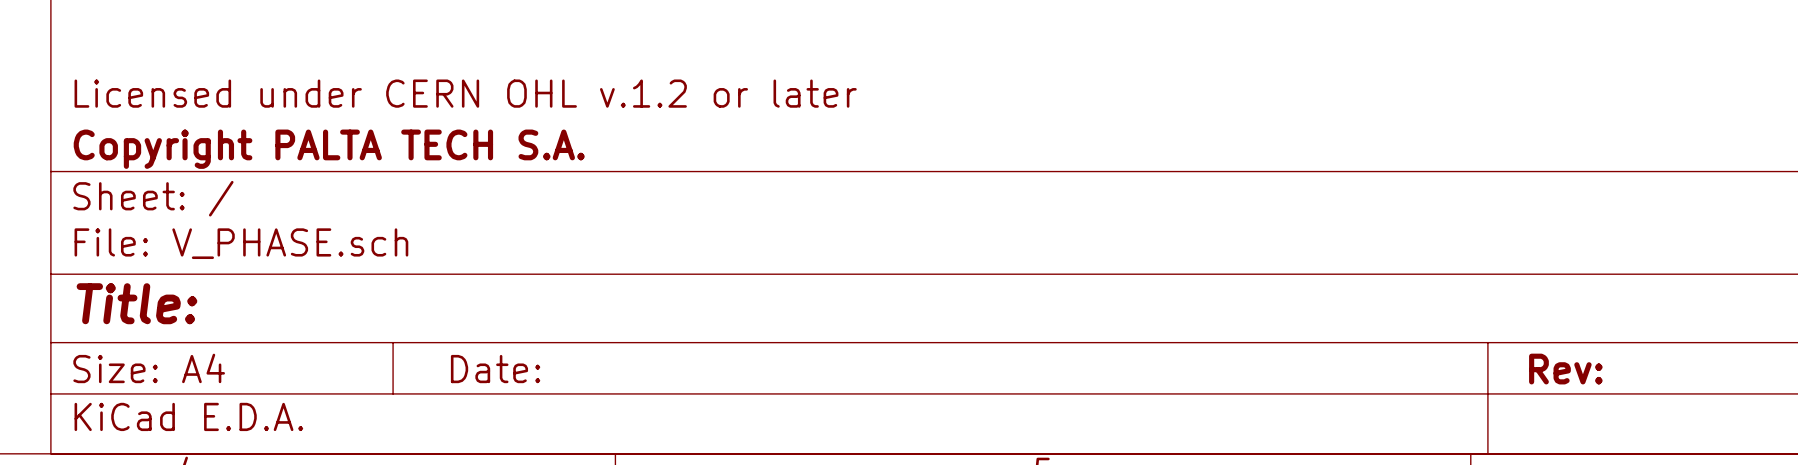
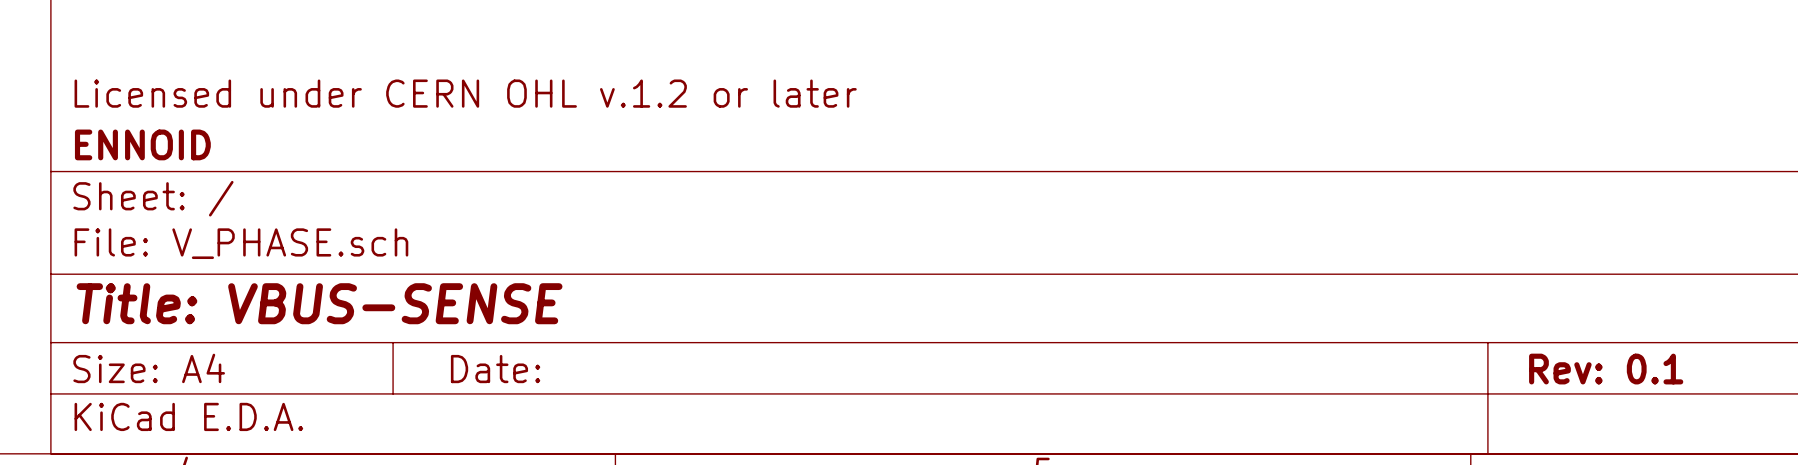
title block: Copyright PALTA TECH S.A. (329, 149) -> ENNOID (142, 144)
title block: Title: (136, 303) -> Title: VBUS-SENSE (319, 303)
title block: Rev: (1565, 369) -> Rev: 0.1 (1606, 369)

